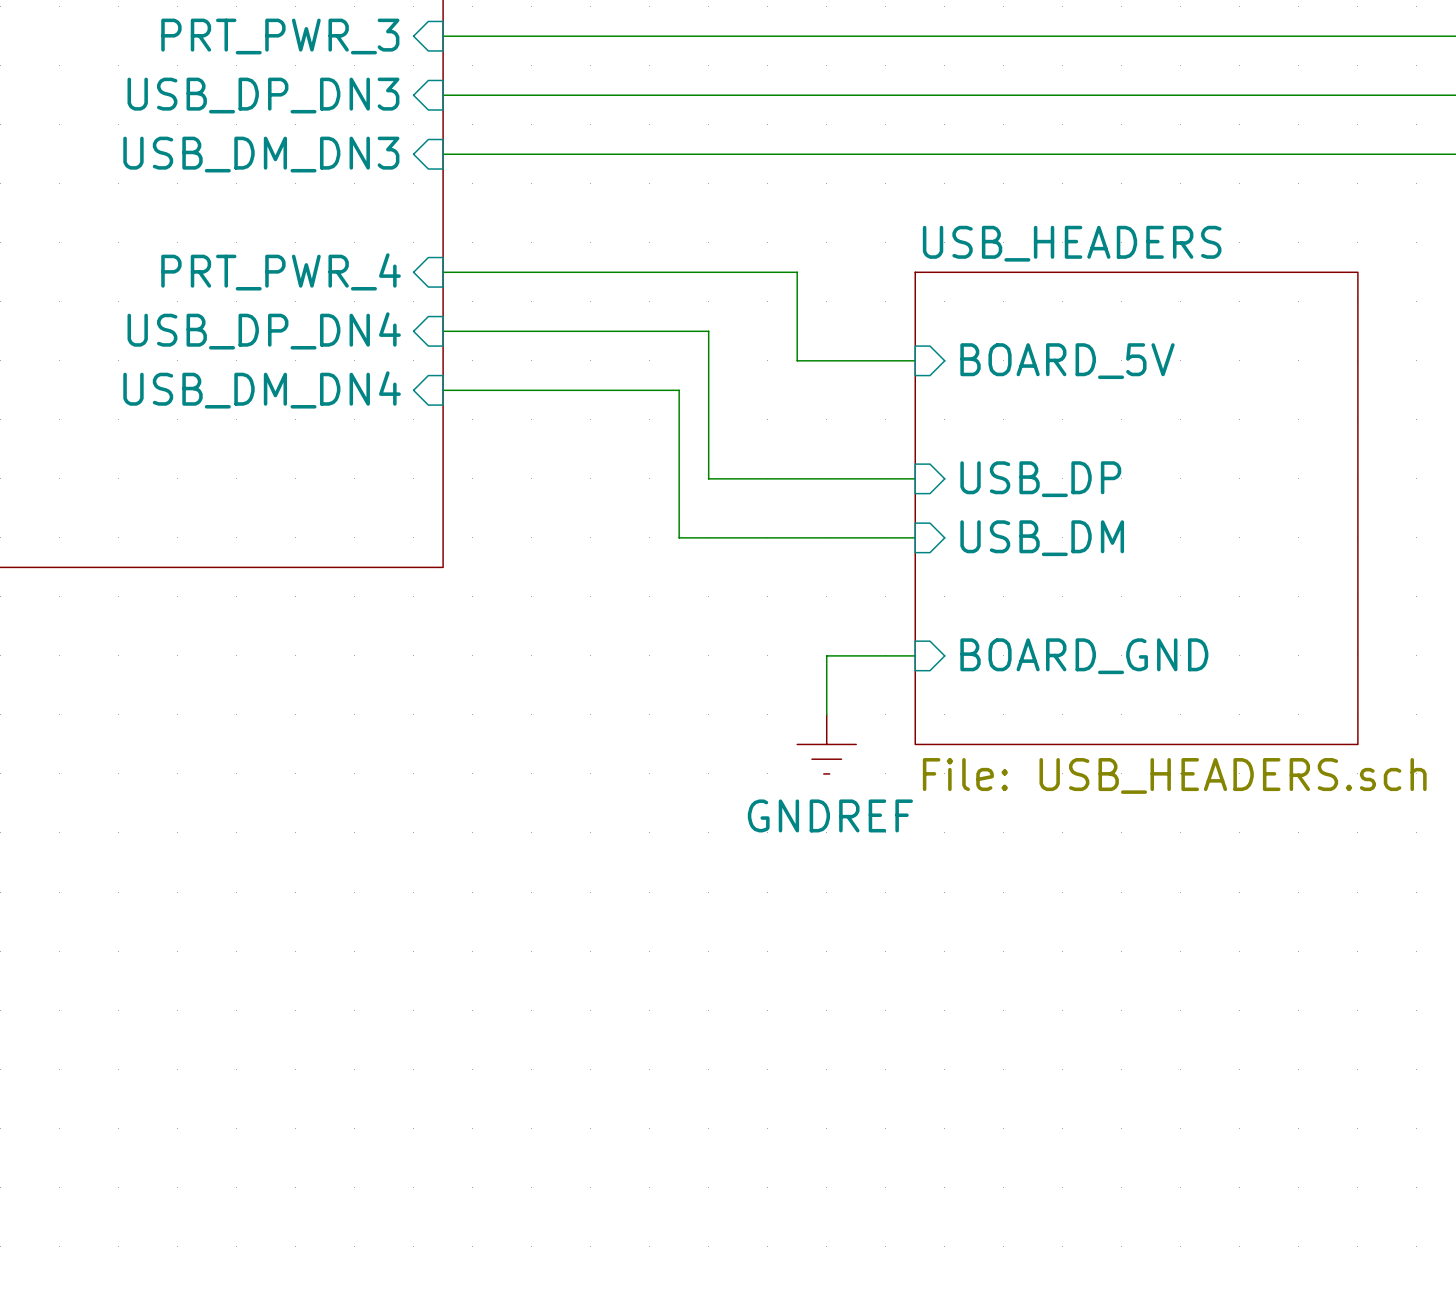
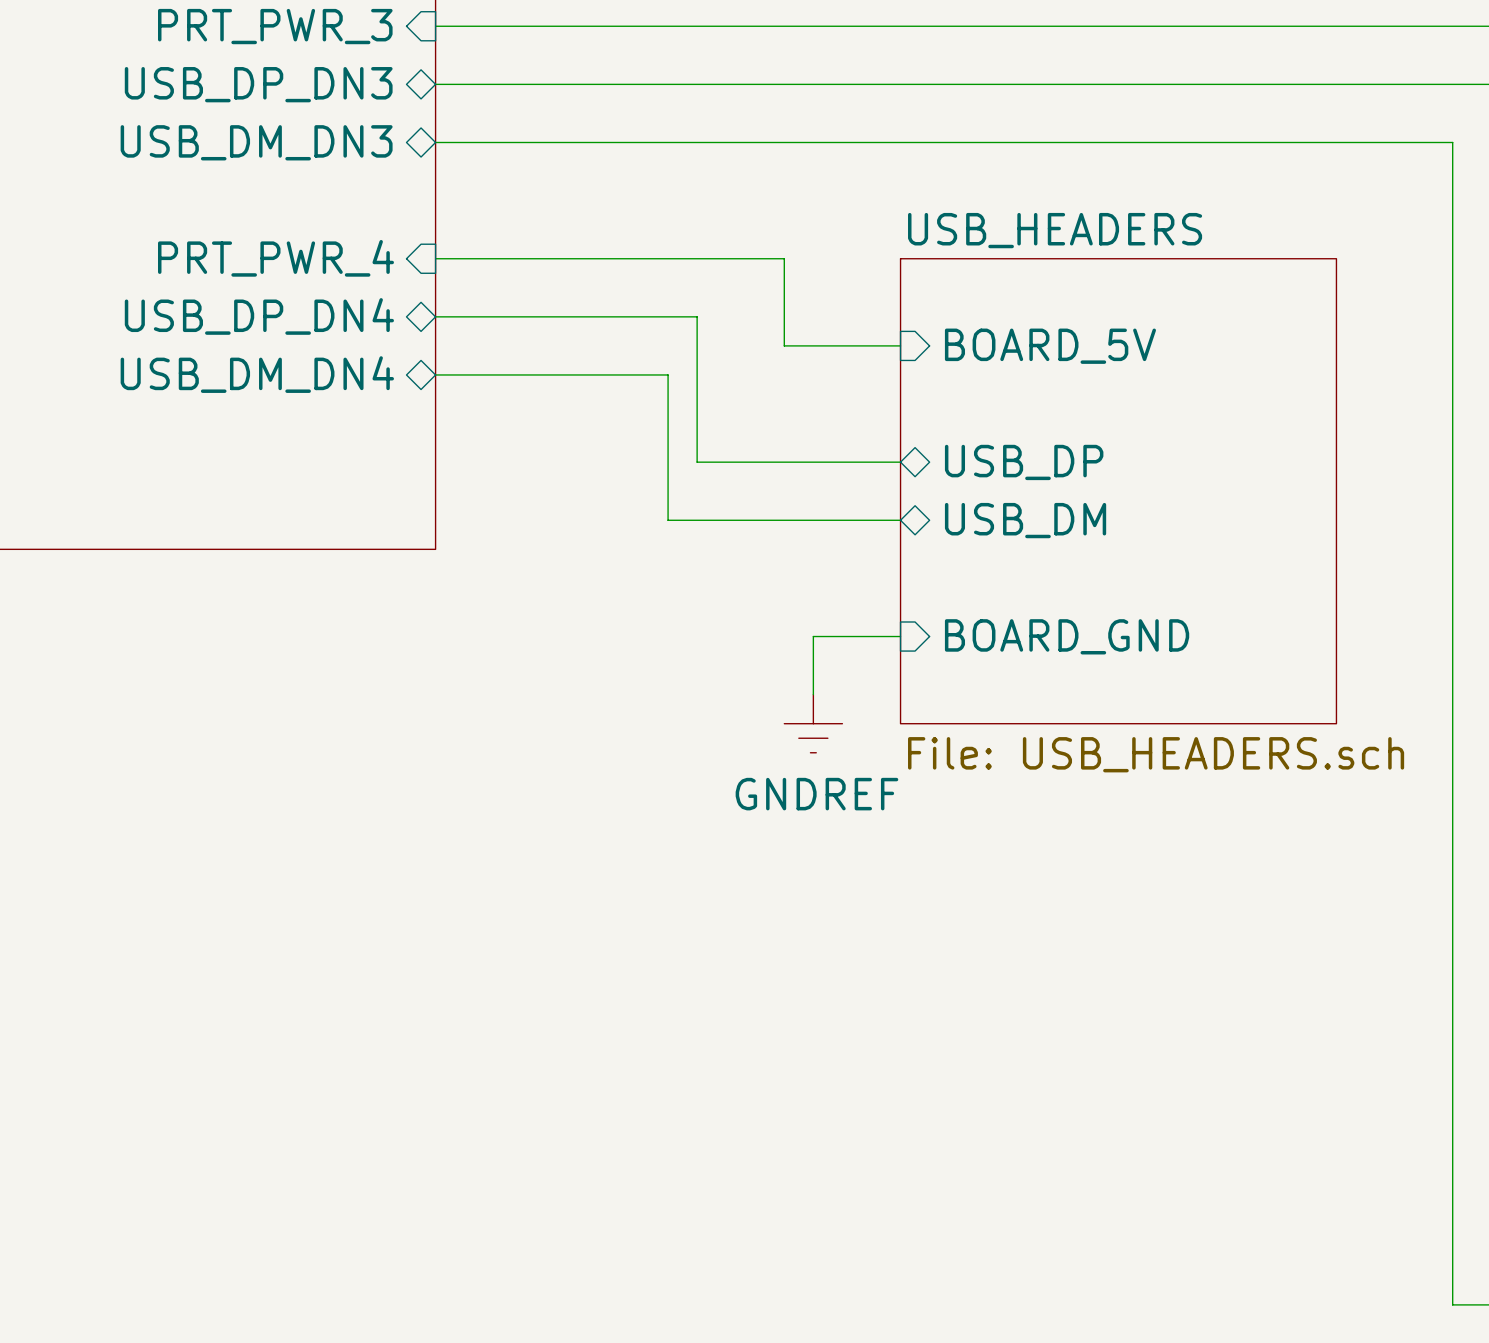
sheet pin shape: input (263, 95) -> bidirectional (258, 84)
sheet pin shape: input (261, 154) -> bidirectional (256, 142)
sheet pin shape: input (264, 330) -> bidirectional (259, 316)
sheet pin shape: input (262, 389) -> bidirectional (257, 374)
sheet pin shape: input (1040, 479) -> bidirectional (1024, 462)
sheet pin shape: input (1042, 538) -> bidirectional (1025, 520)

